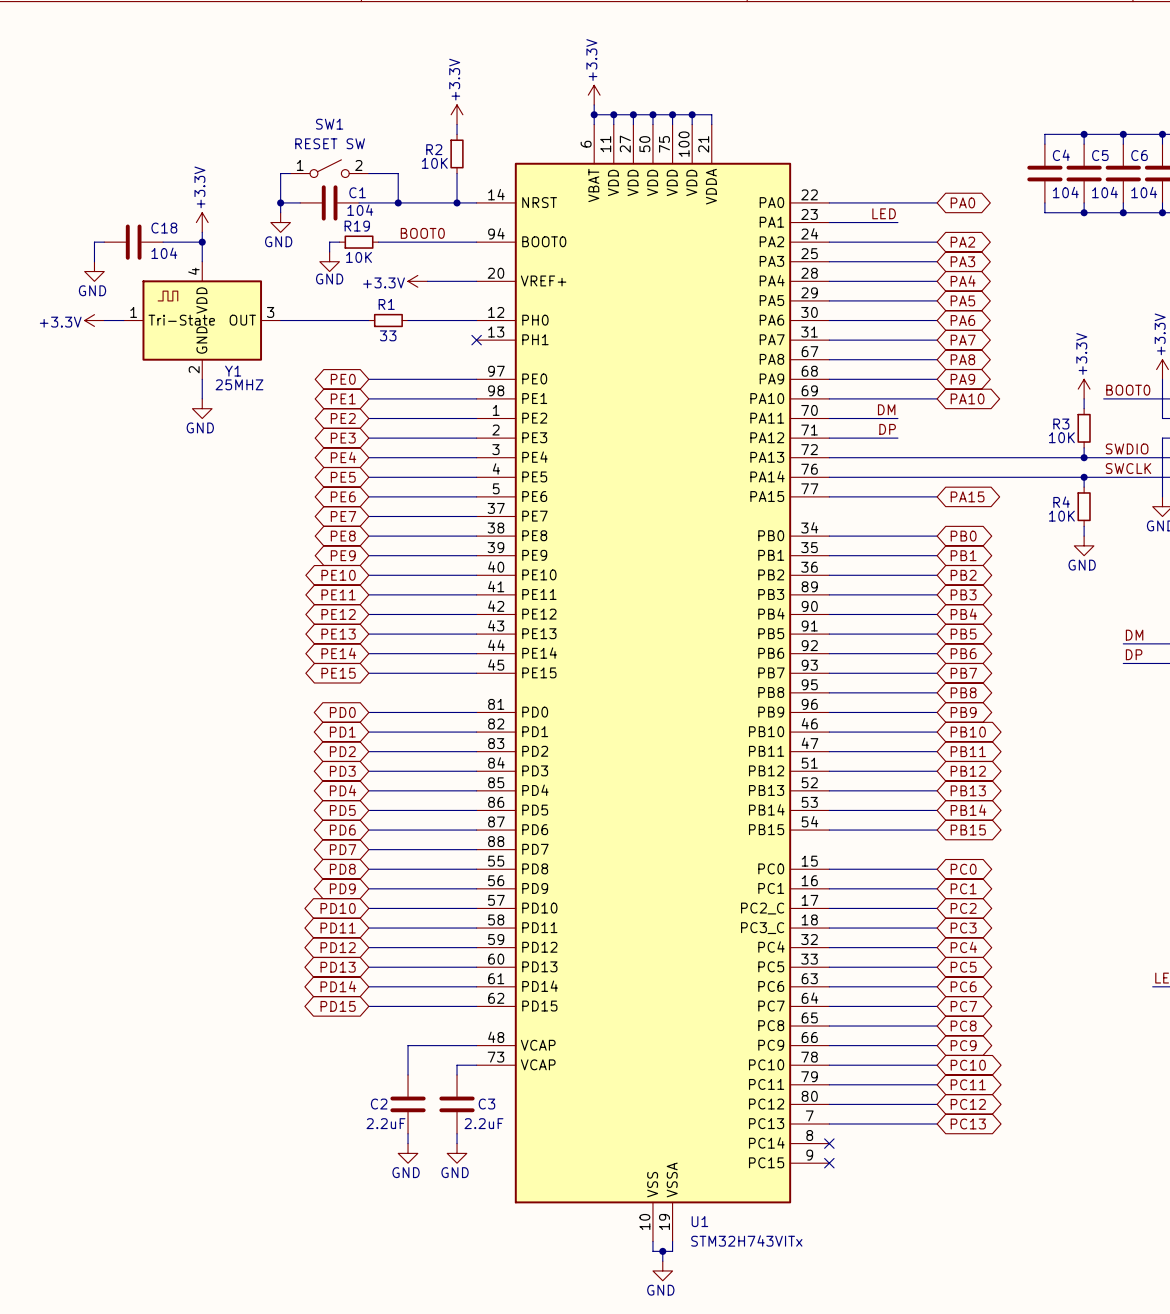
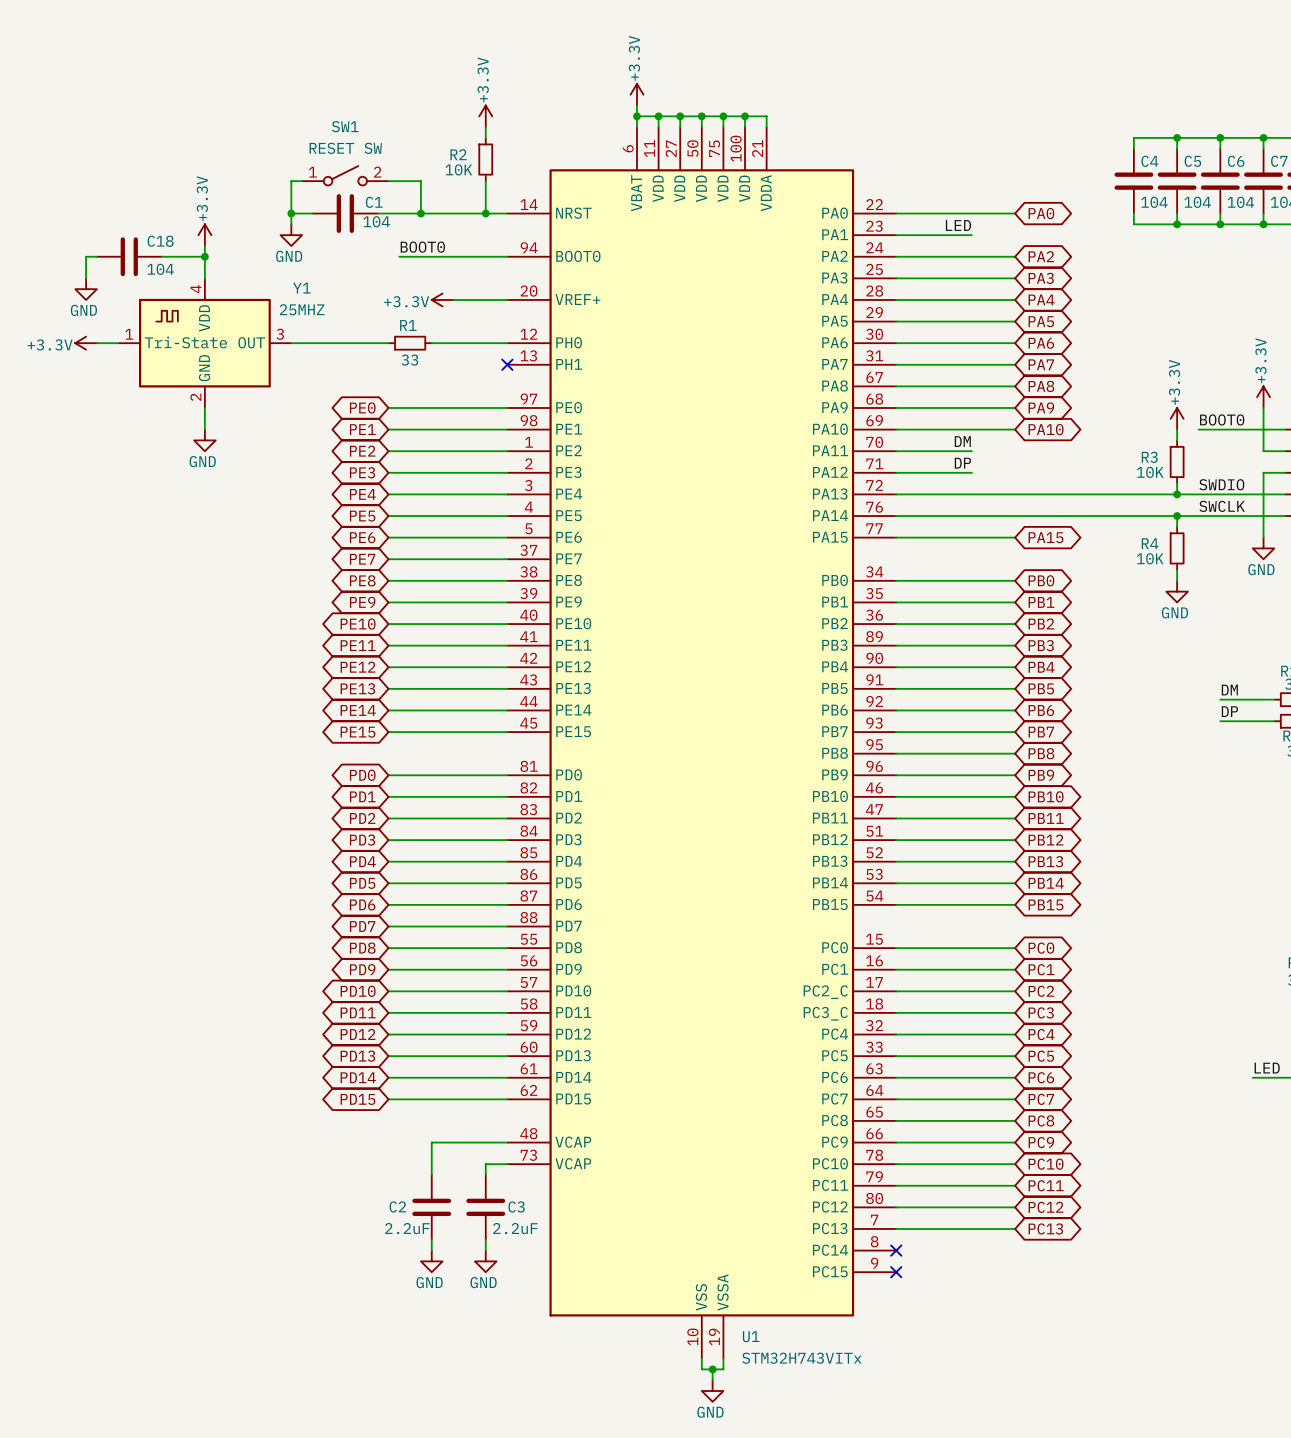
label position: BOOT0 (422, 233) -> BOOT0 (422, 247)
wire: (339, 242) (329, 242) (329, 251) -> none
R19: 10K (359, 242) -> none
power symbol: GND (329, 261) -> none
Y1 name position: Y1 (233, 371) -> Y1 (301, 288)
Y1 value position: 25MHZ (239, 384) -> 25MHZ (302, 309)

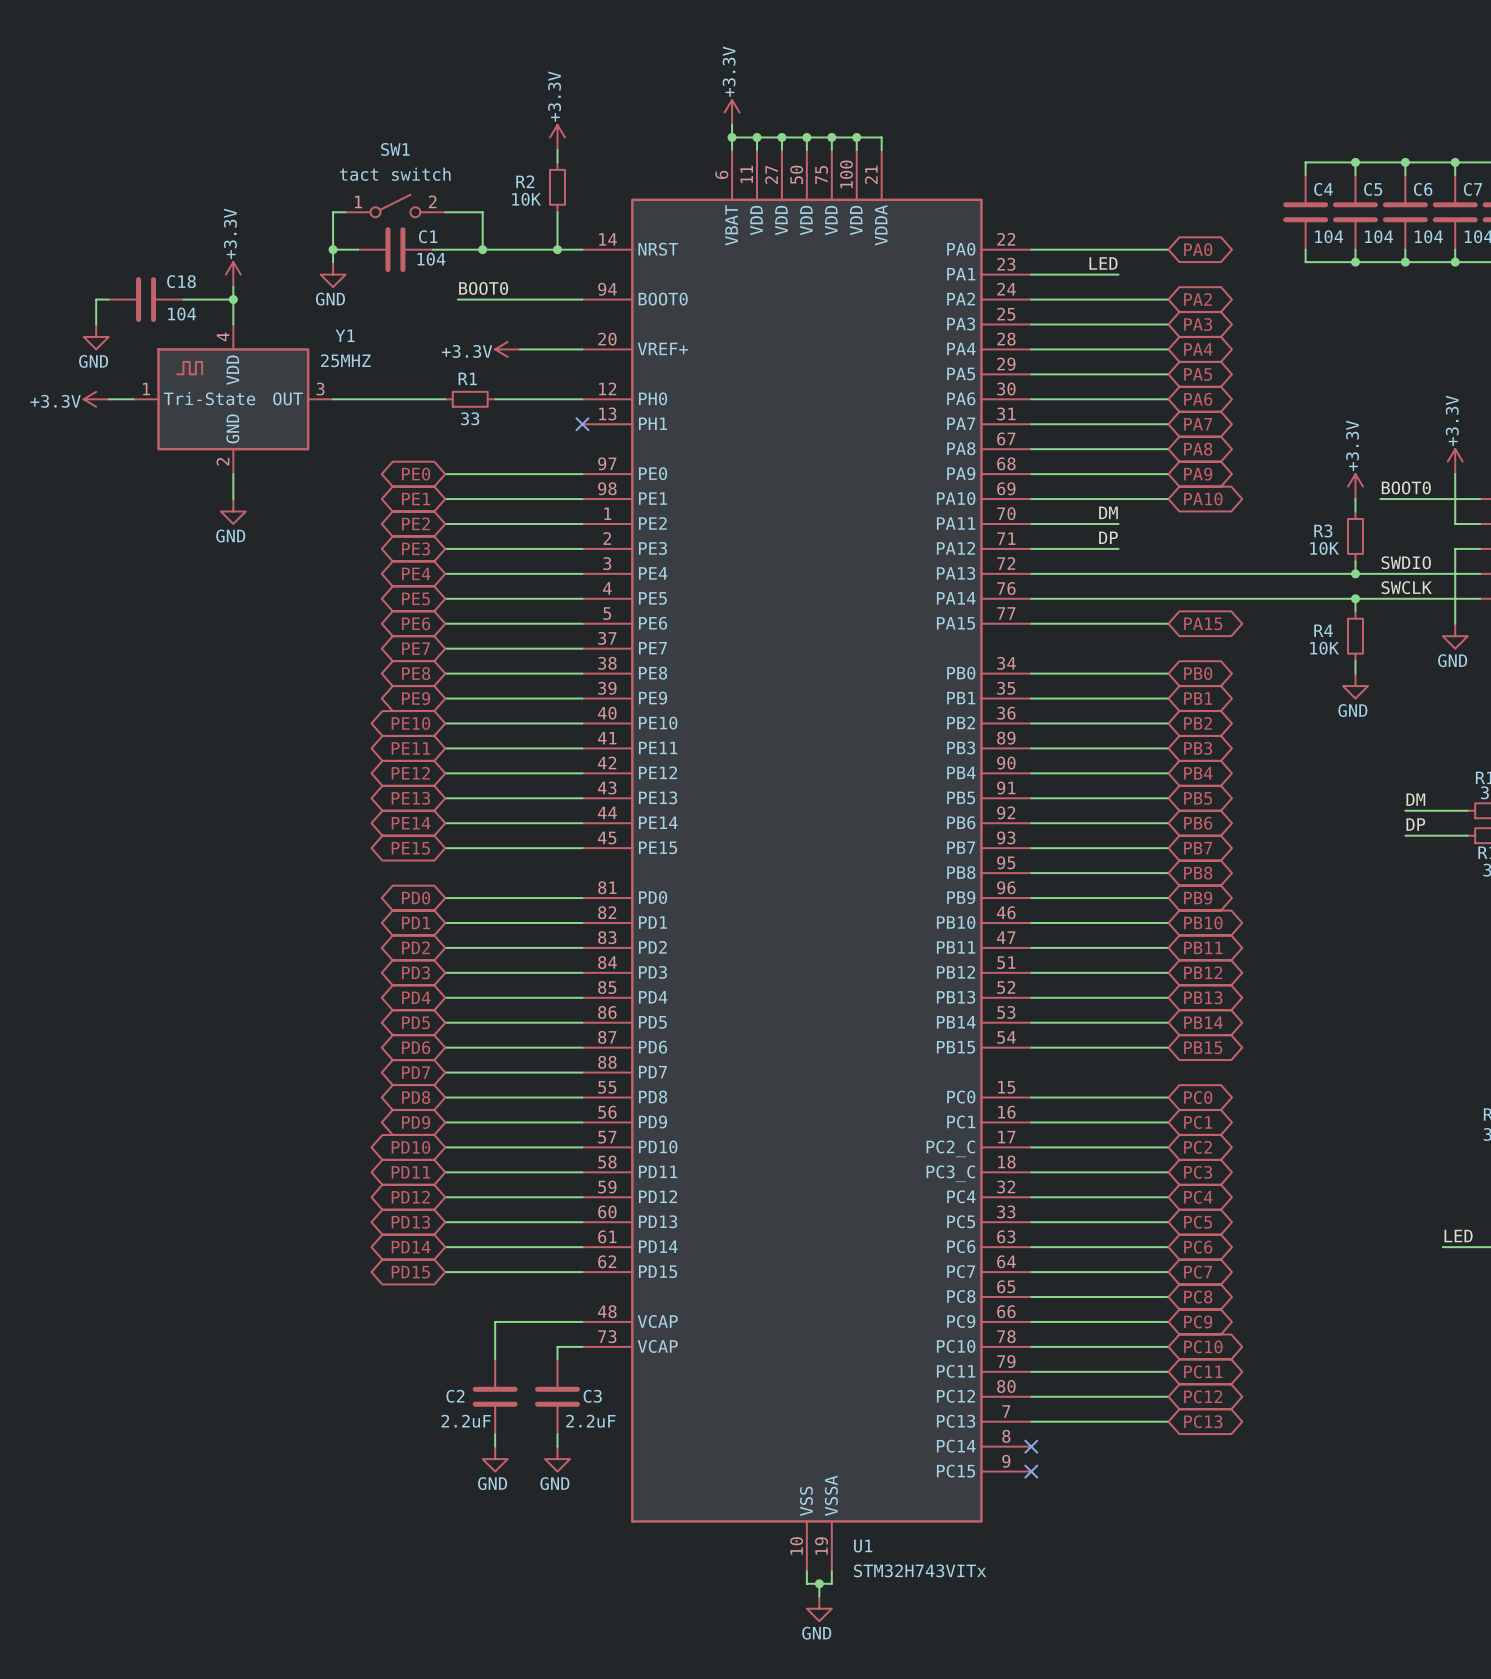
SW1 value: RESET SW (345, 148) -> tact switch (395, 174)

